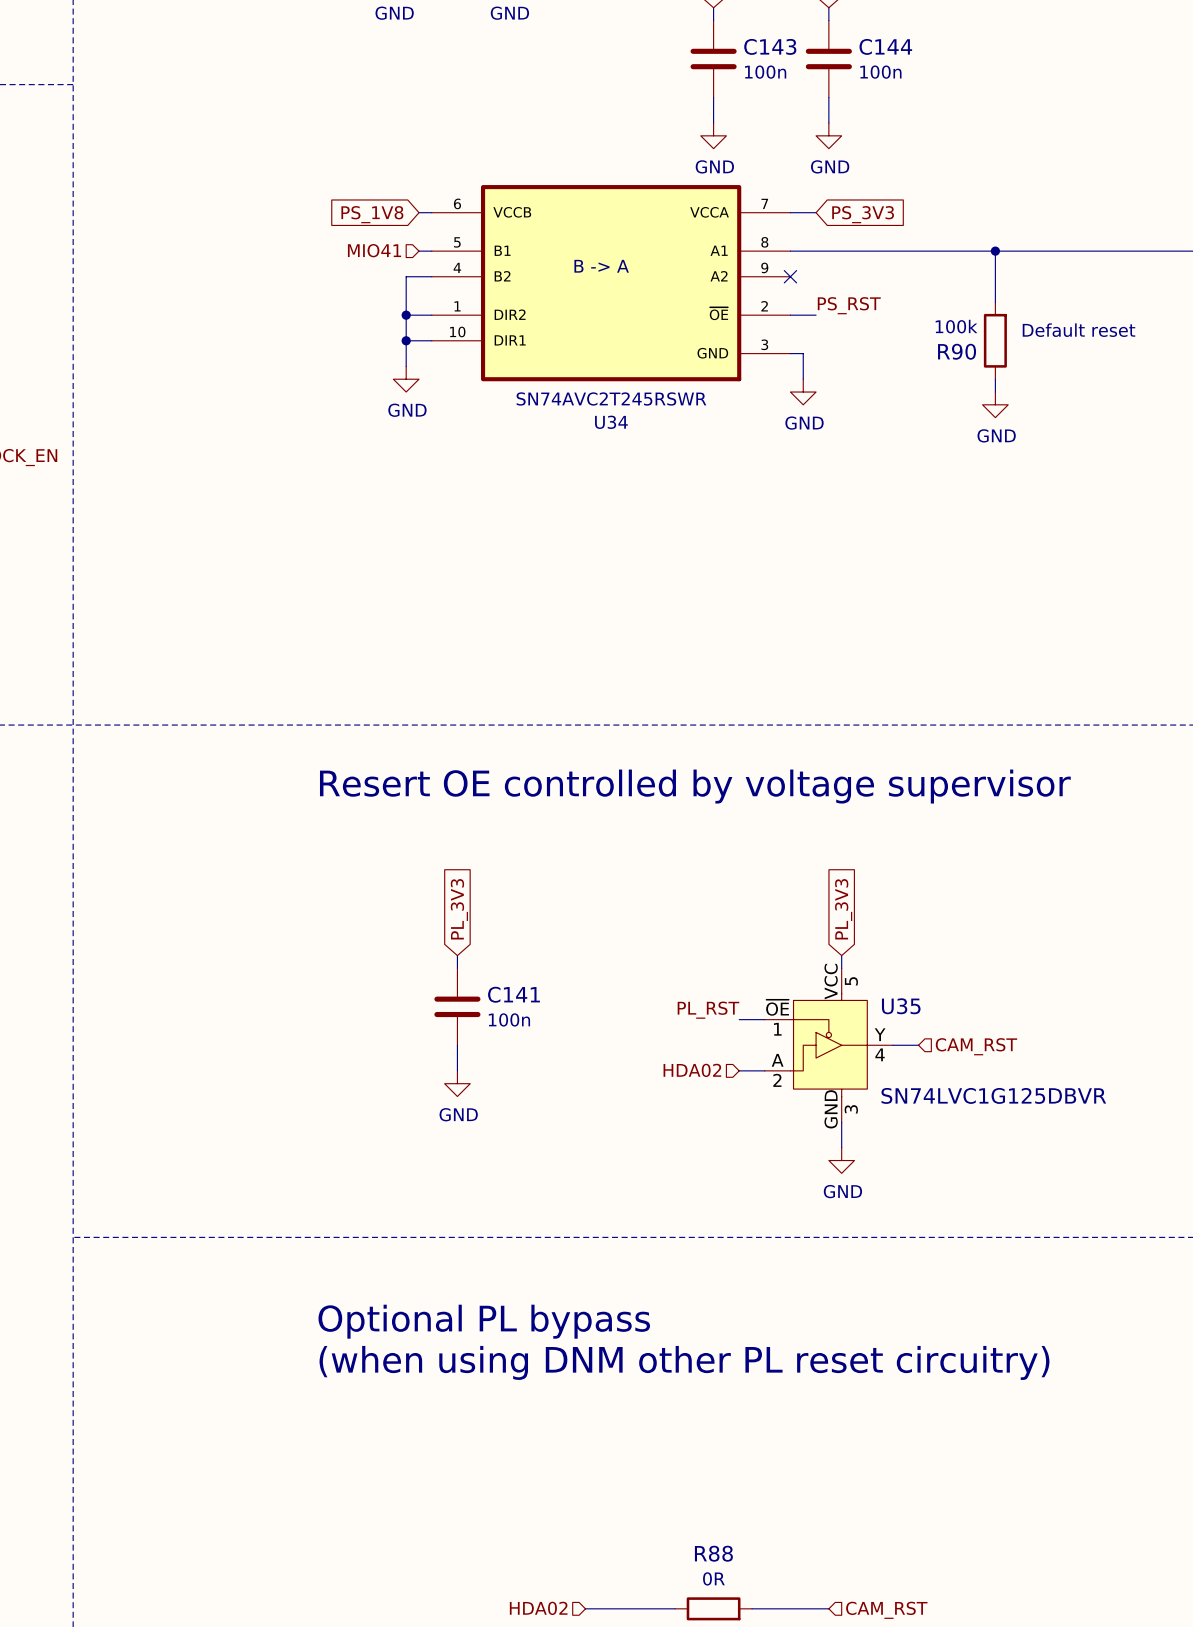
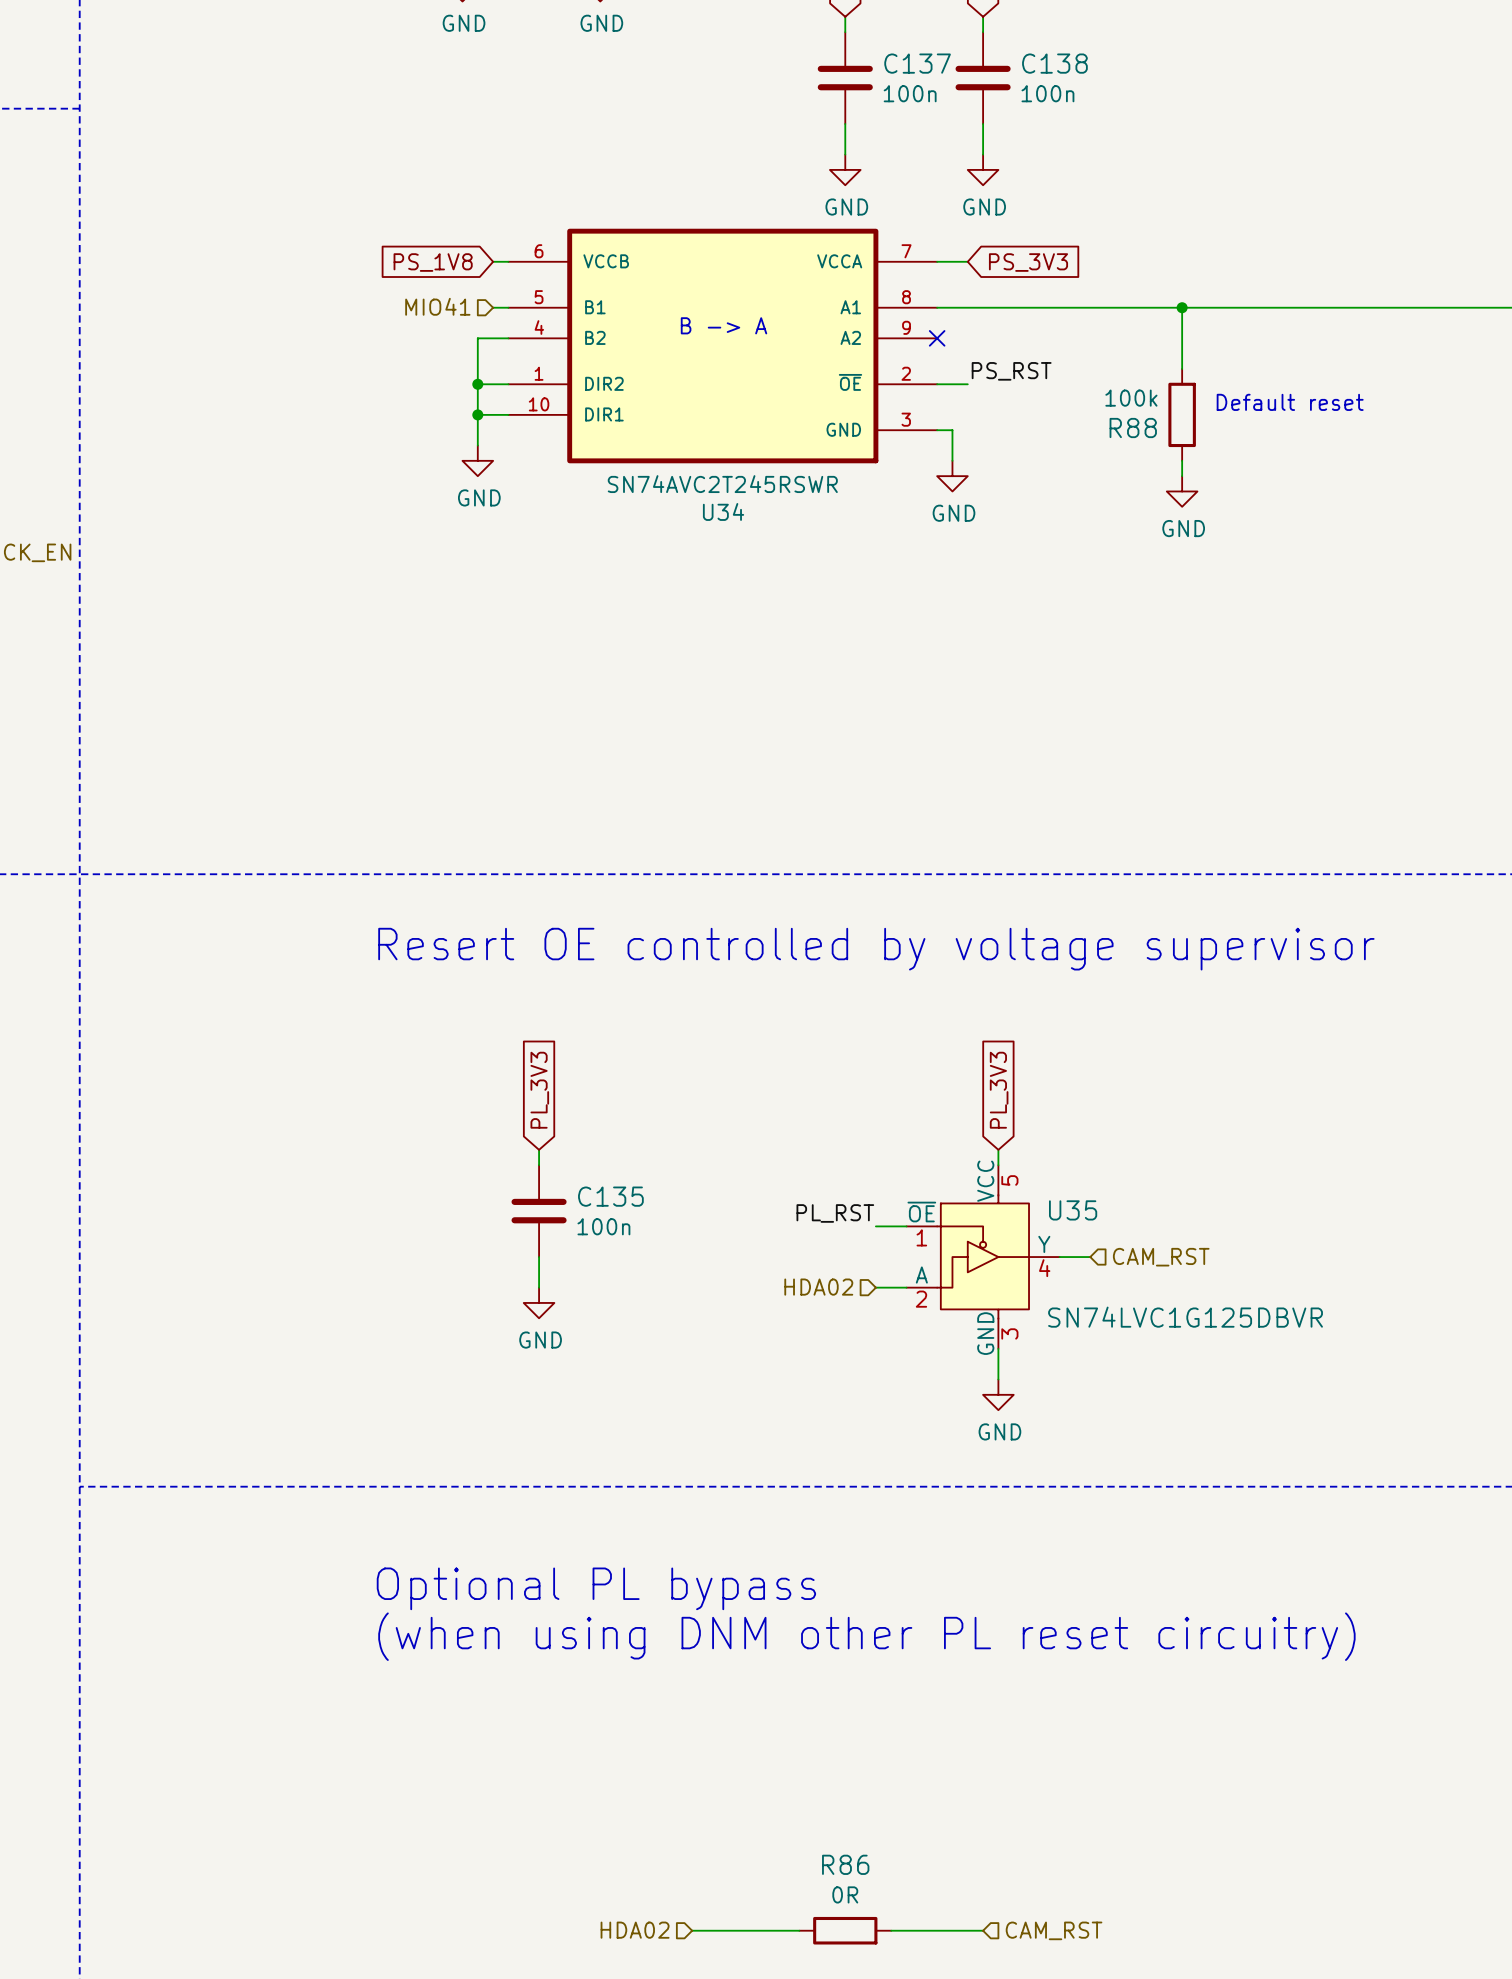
C143 name: C143 (770, 46) -> C137 (917, 63)
C144 name: C144 (885, 46) -> C138 (1054, 63)
R90 name: R90 (957, 351) -> R88 (1133, 428)
C141 name: C141 (513, 994) -> C135 (610, 1196)
R88 name: R88 (713, 1553) -> R86 (845, 1864)

